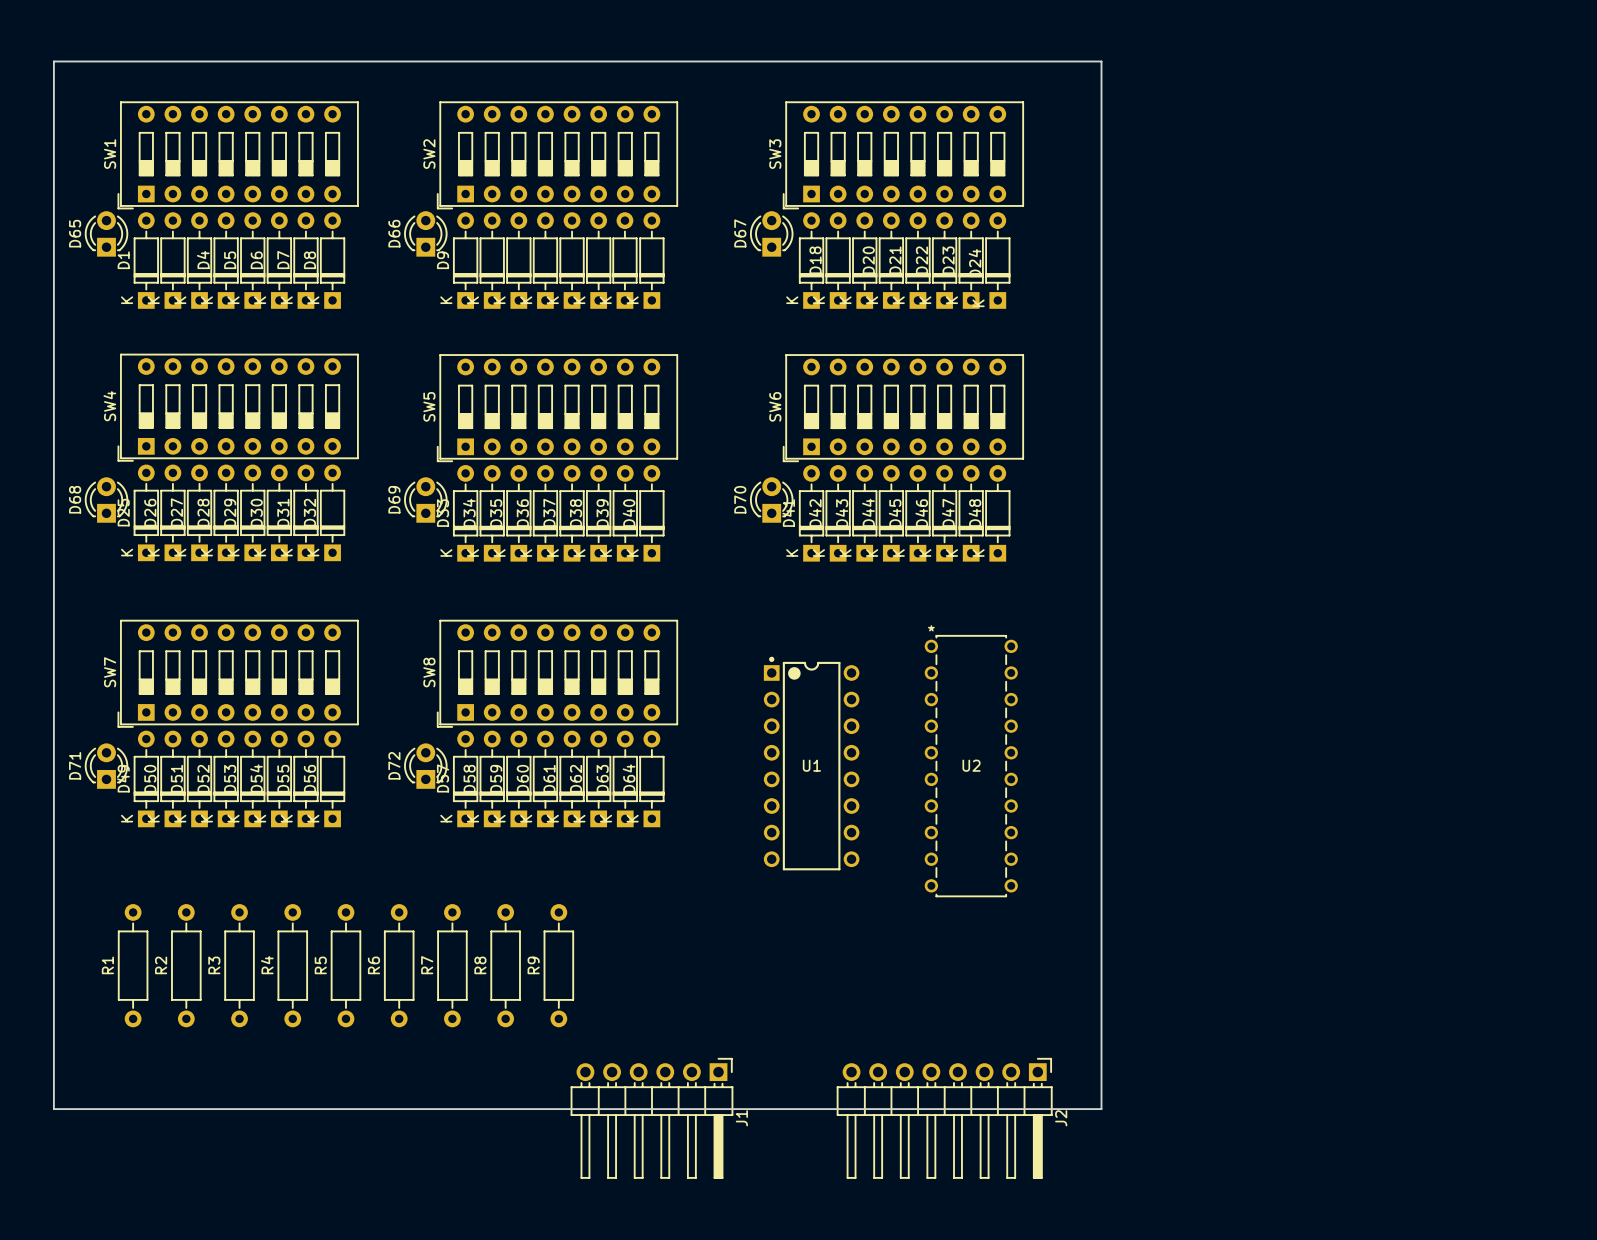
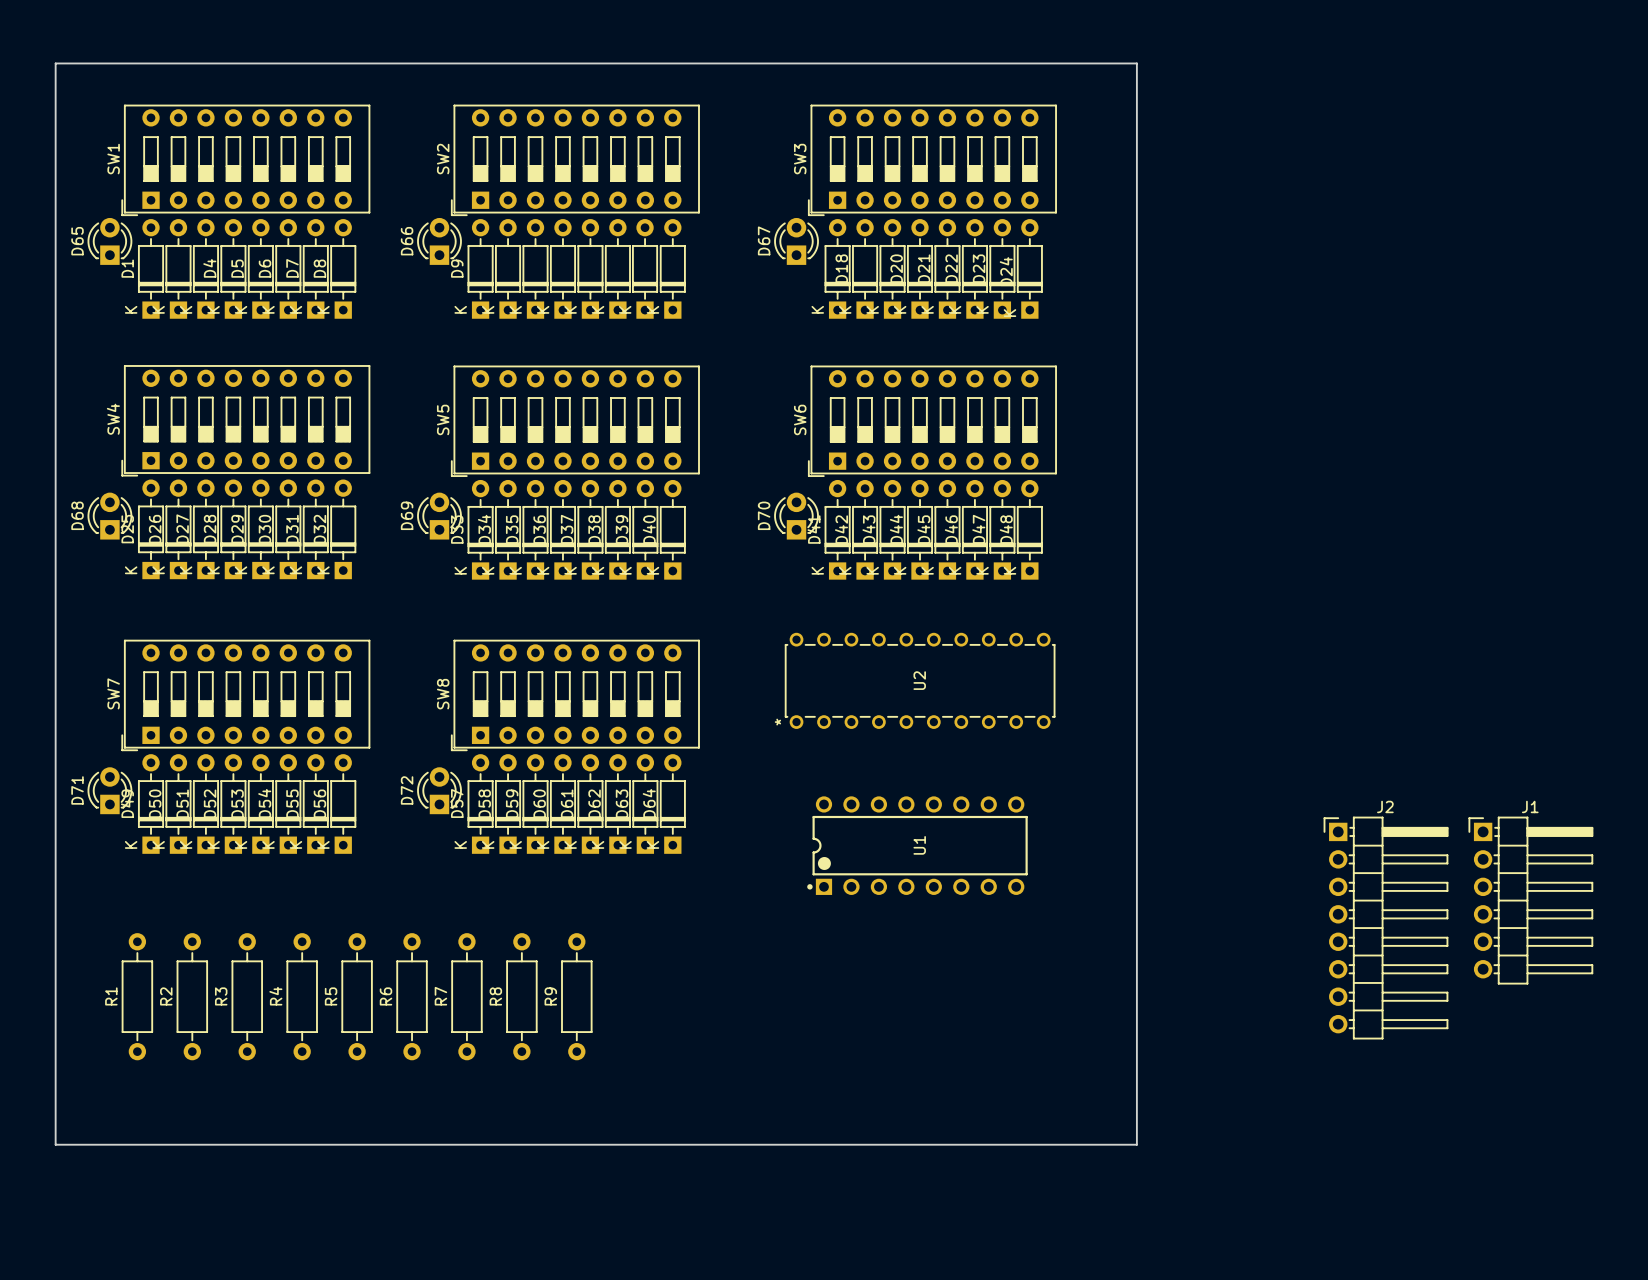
U1 rotation: 0° (811, 763) -> 90° counterclockwise (917, 845)
U2 rotation: 0° (971, 766) -> 90° counterclockwise (920, 680)
J1 rotation: 0° (651, 1118) -> 90° counterclockwise (1530, 900)
J1 position: (651, 1118) -> (1530, 900)
J2 rotation: 0° (944, 1118) -> 90° counterclockwise (1385, 928)
J2 position: (944, 1118) -> (1385, 928)

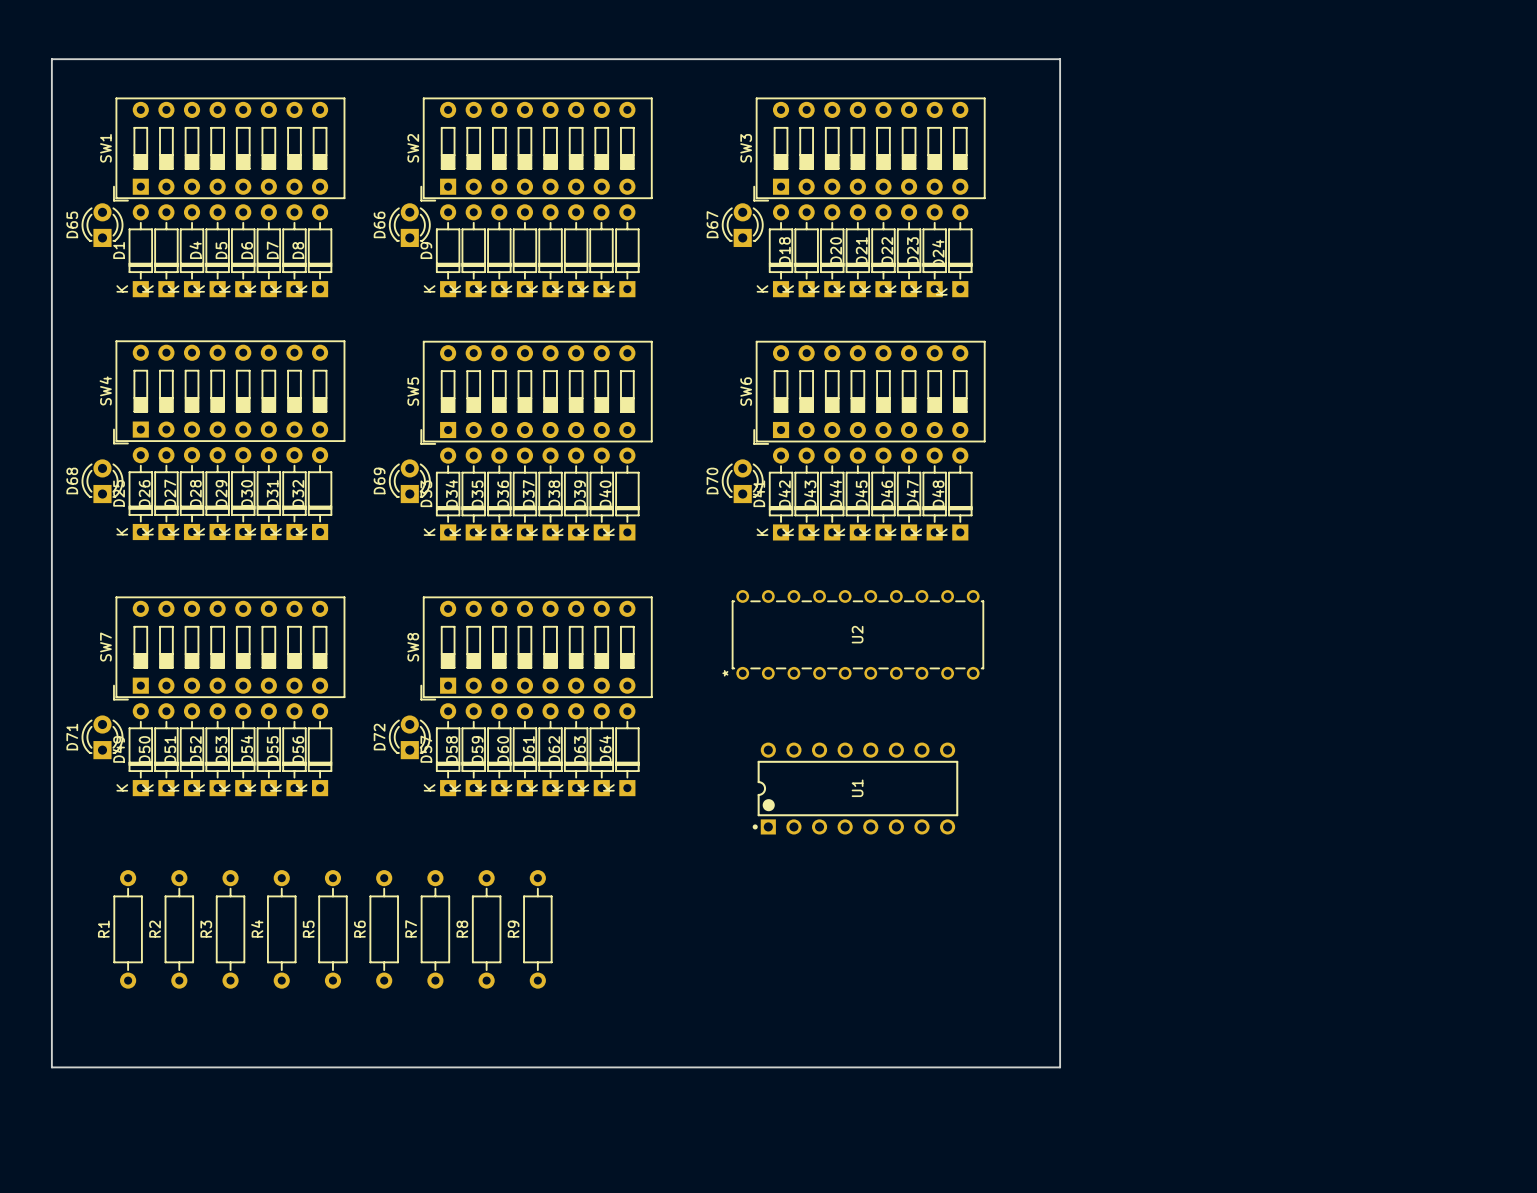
J1: (1530, 900) -> none
J2: (1385, 928) -> none

